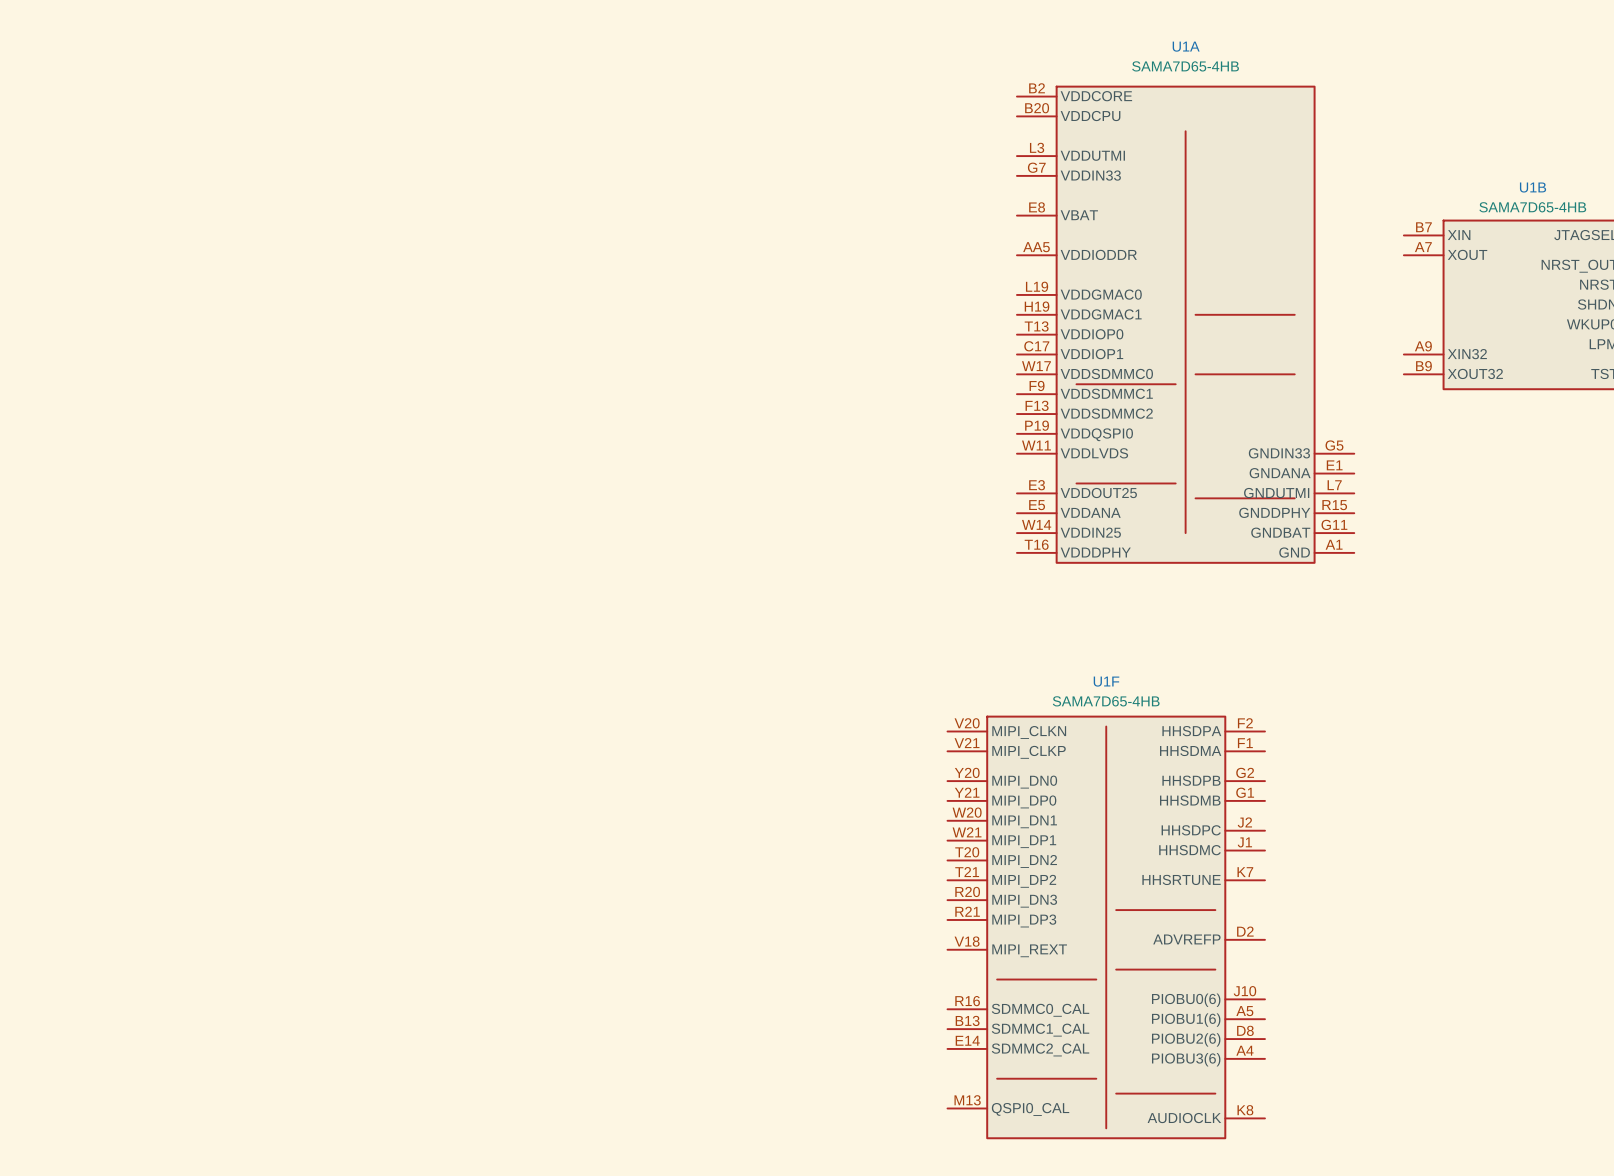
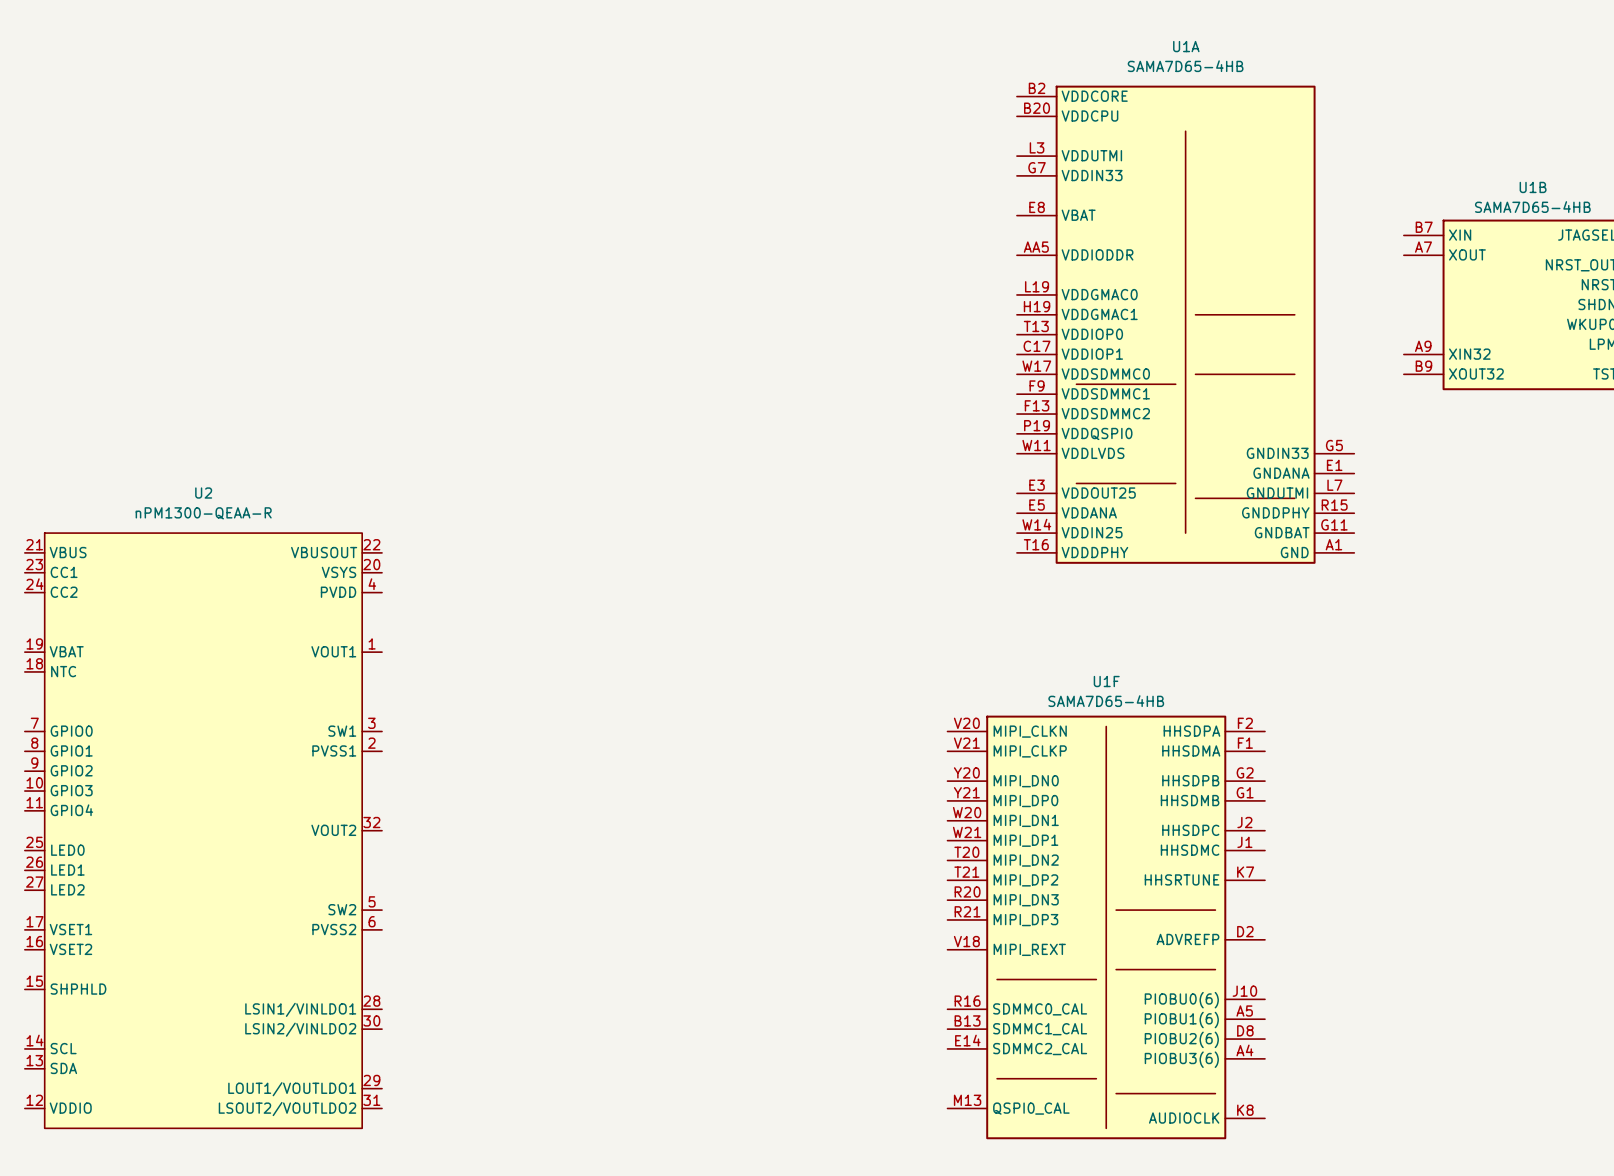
U2: none -> nPM1300-QEAA-R (203, 830)

